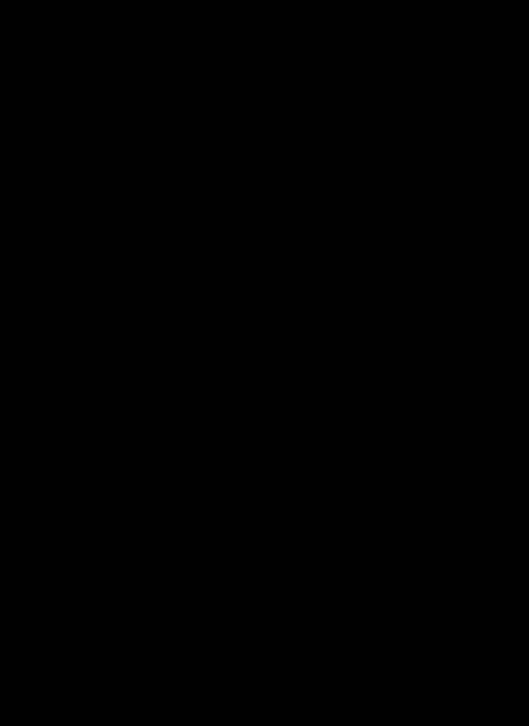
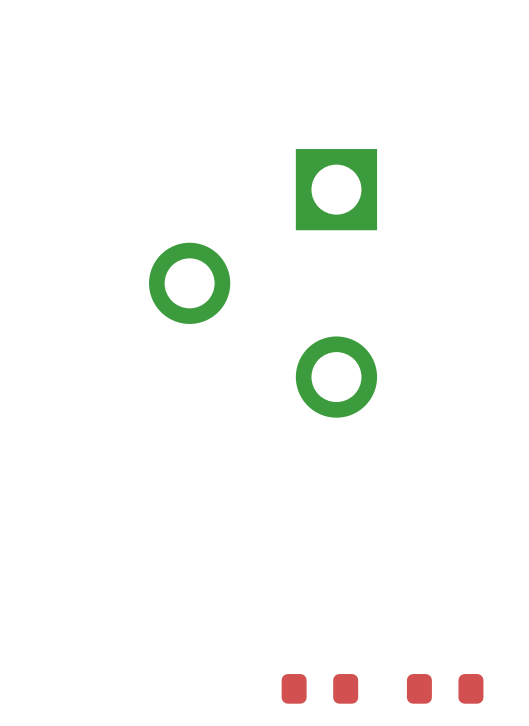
part: none -> (263, 283)
part: none -> (319, 688)
part: none -> (445, 688)

